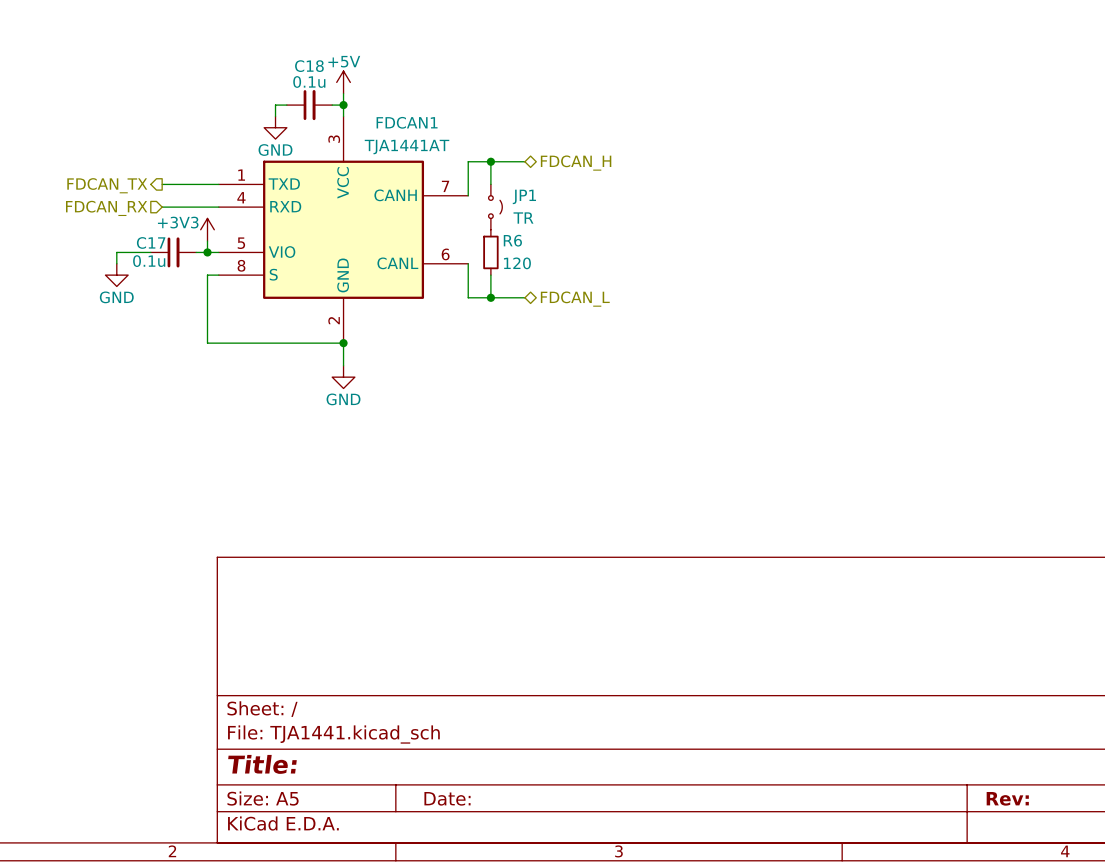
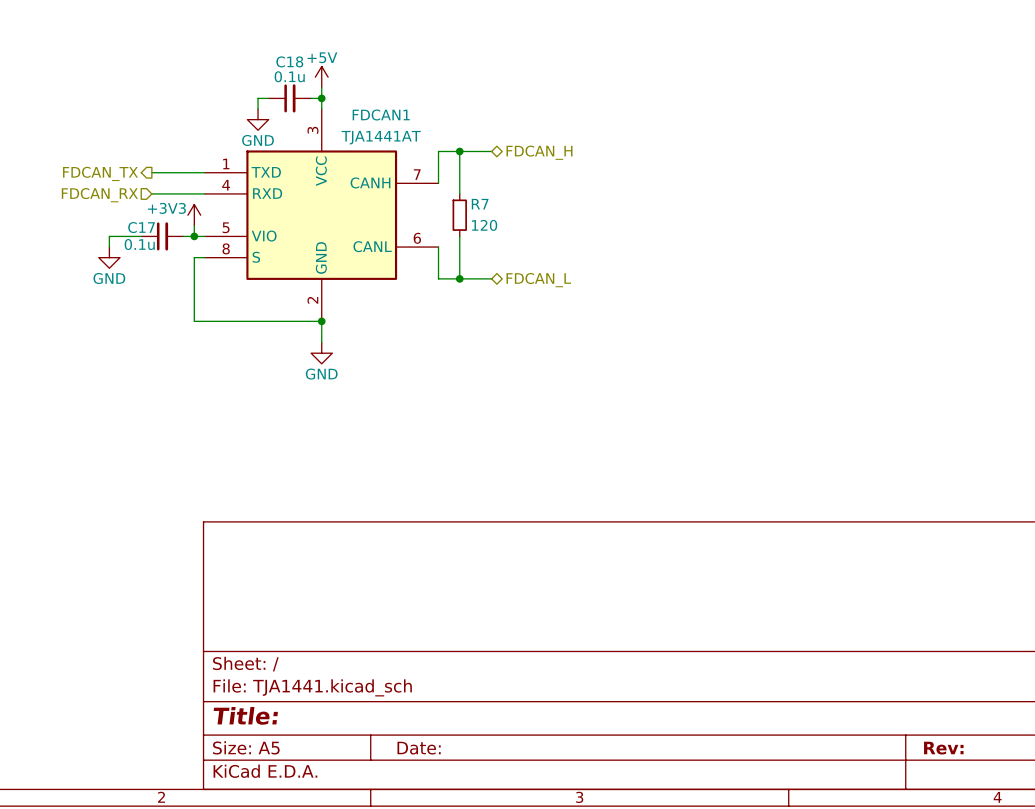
JP1: TR (495, 207) -> none
R7: none -> 120 (459, 215)
wire: none -> (459, 236) (459, 257)
R6: 120 (490, 252) -> none

